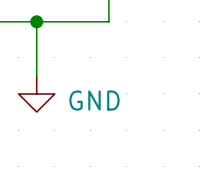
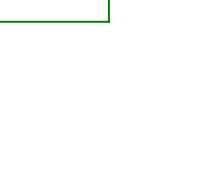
wire: (36, 21) (36, 75) -> none
junction: (36, 21) -> none
power symbol: GND (36, 93) -> none

